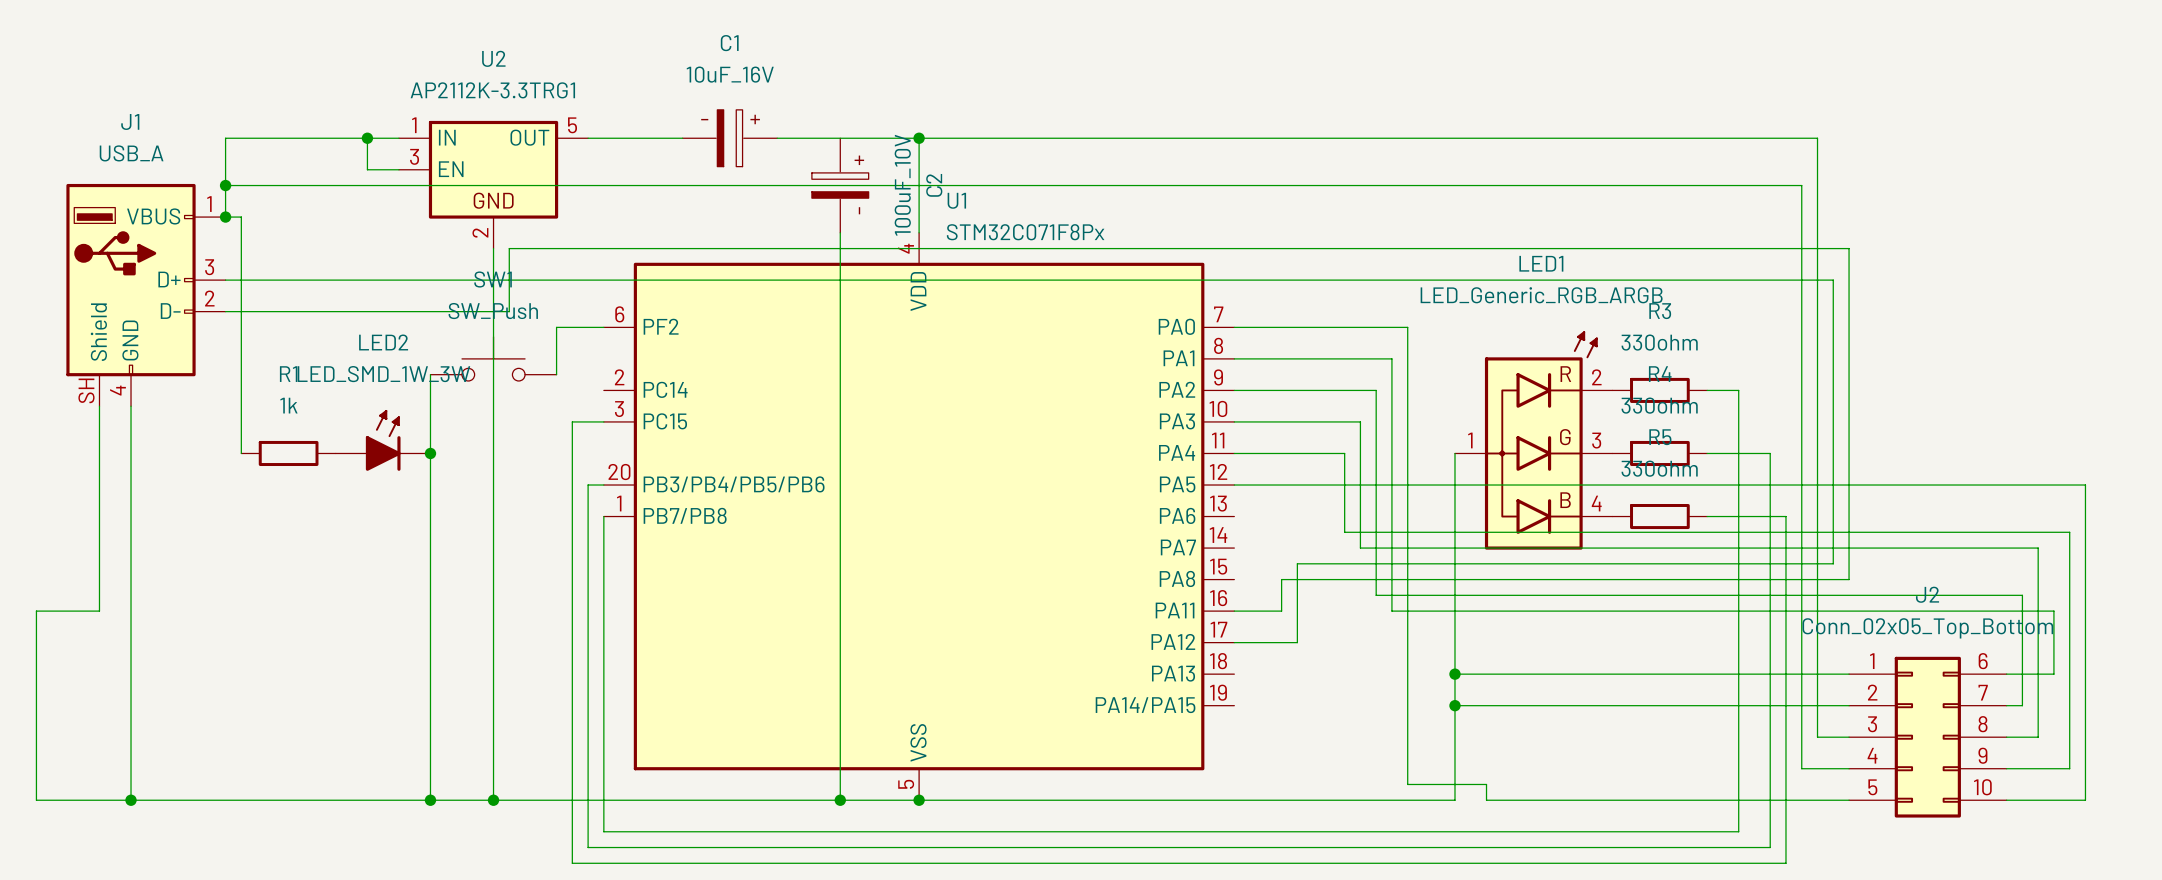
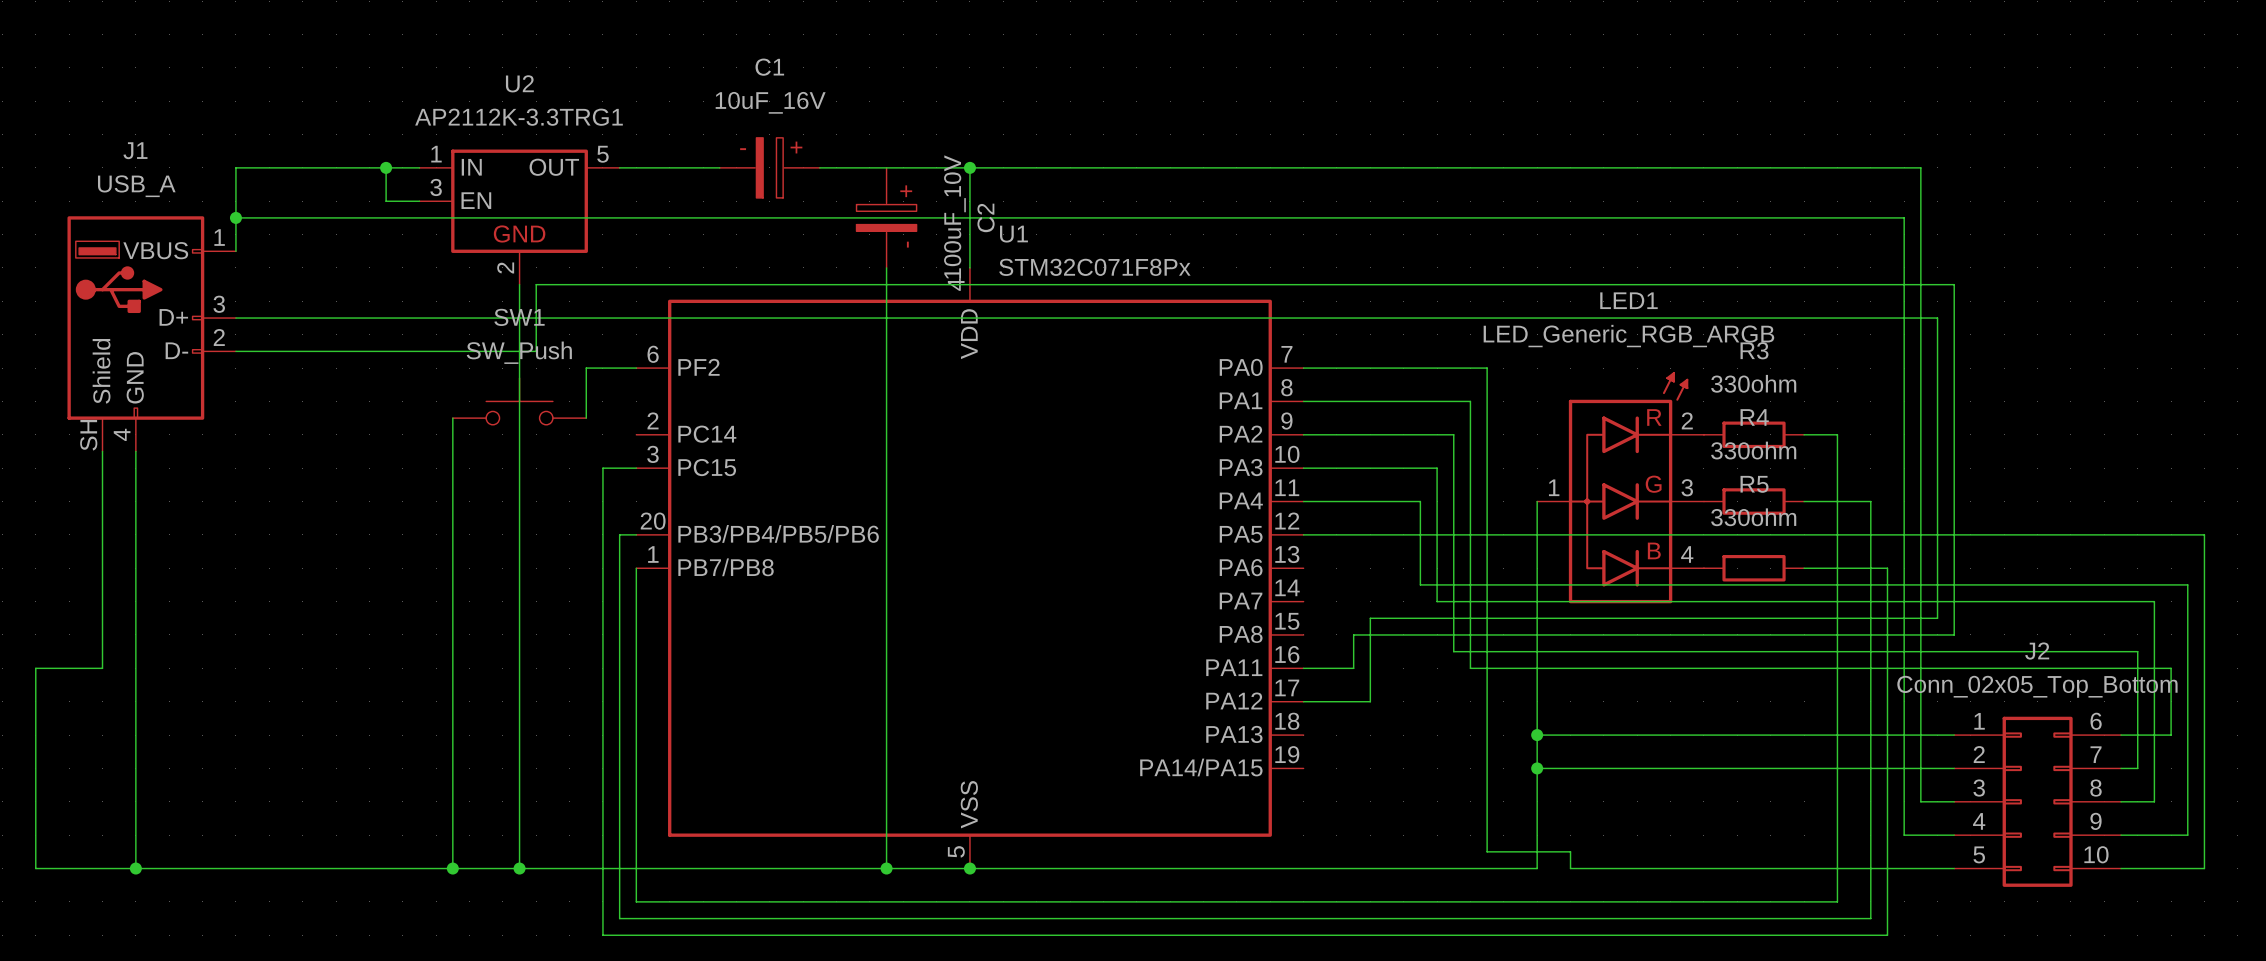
wire: (225, 217) (241, 217) (241, 453) -> none
junction: (225, 217) -> none
LED2: LED_SMD_1W_3W (383, 440) -> none
R1: 1k (288, 453) -> none
junction: (430, 453) -> none

